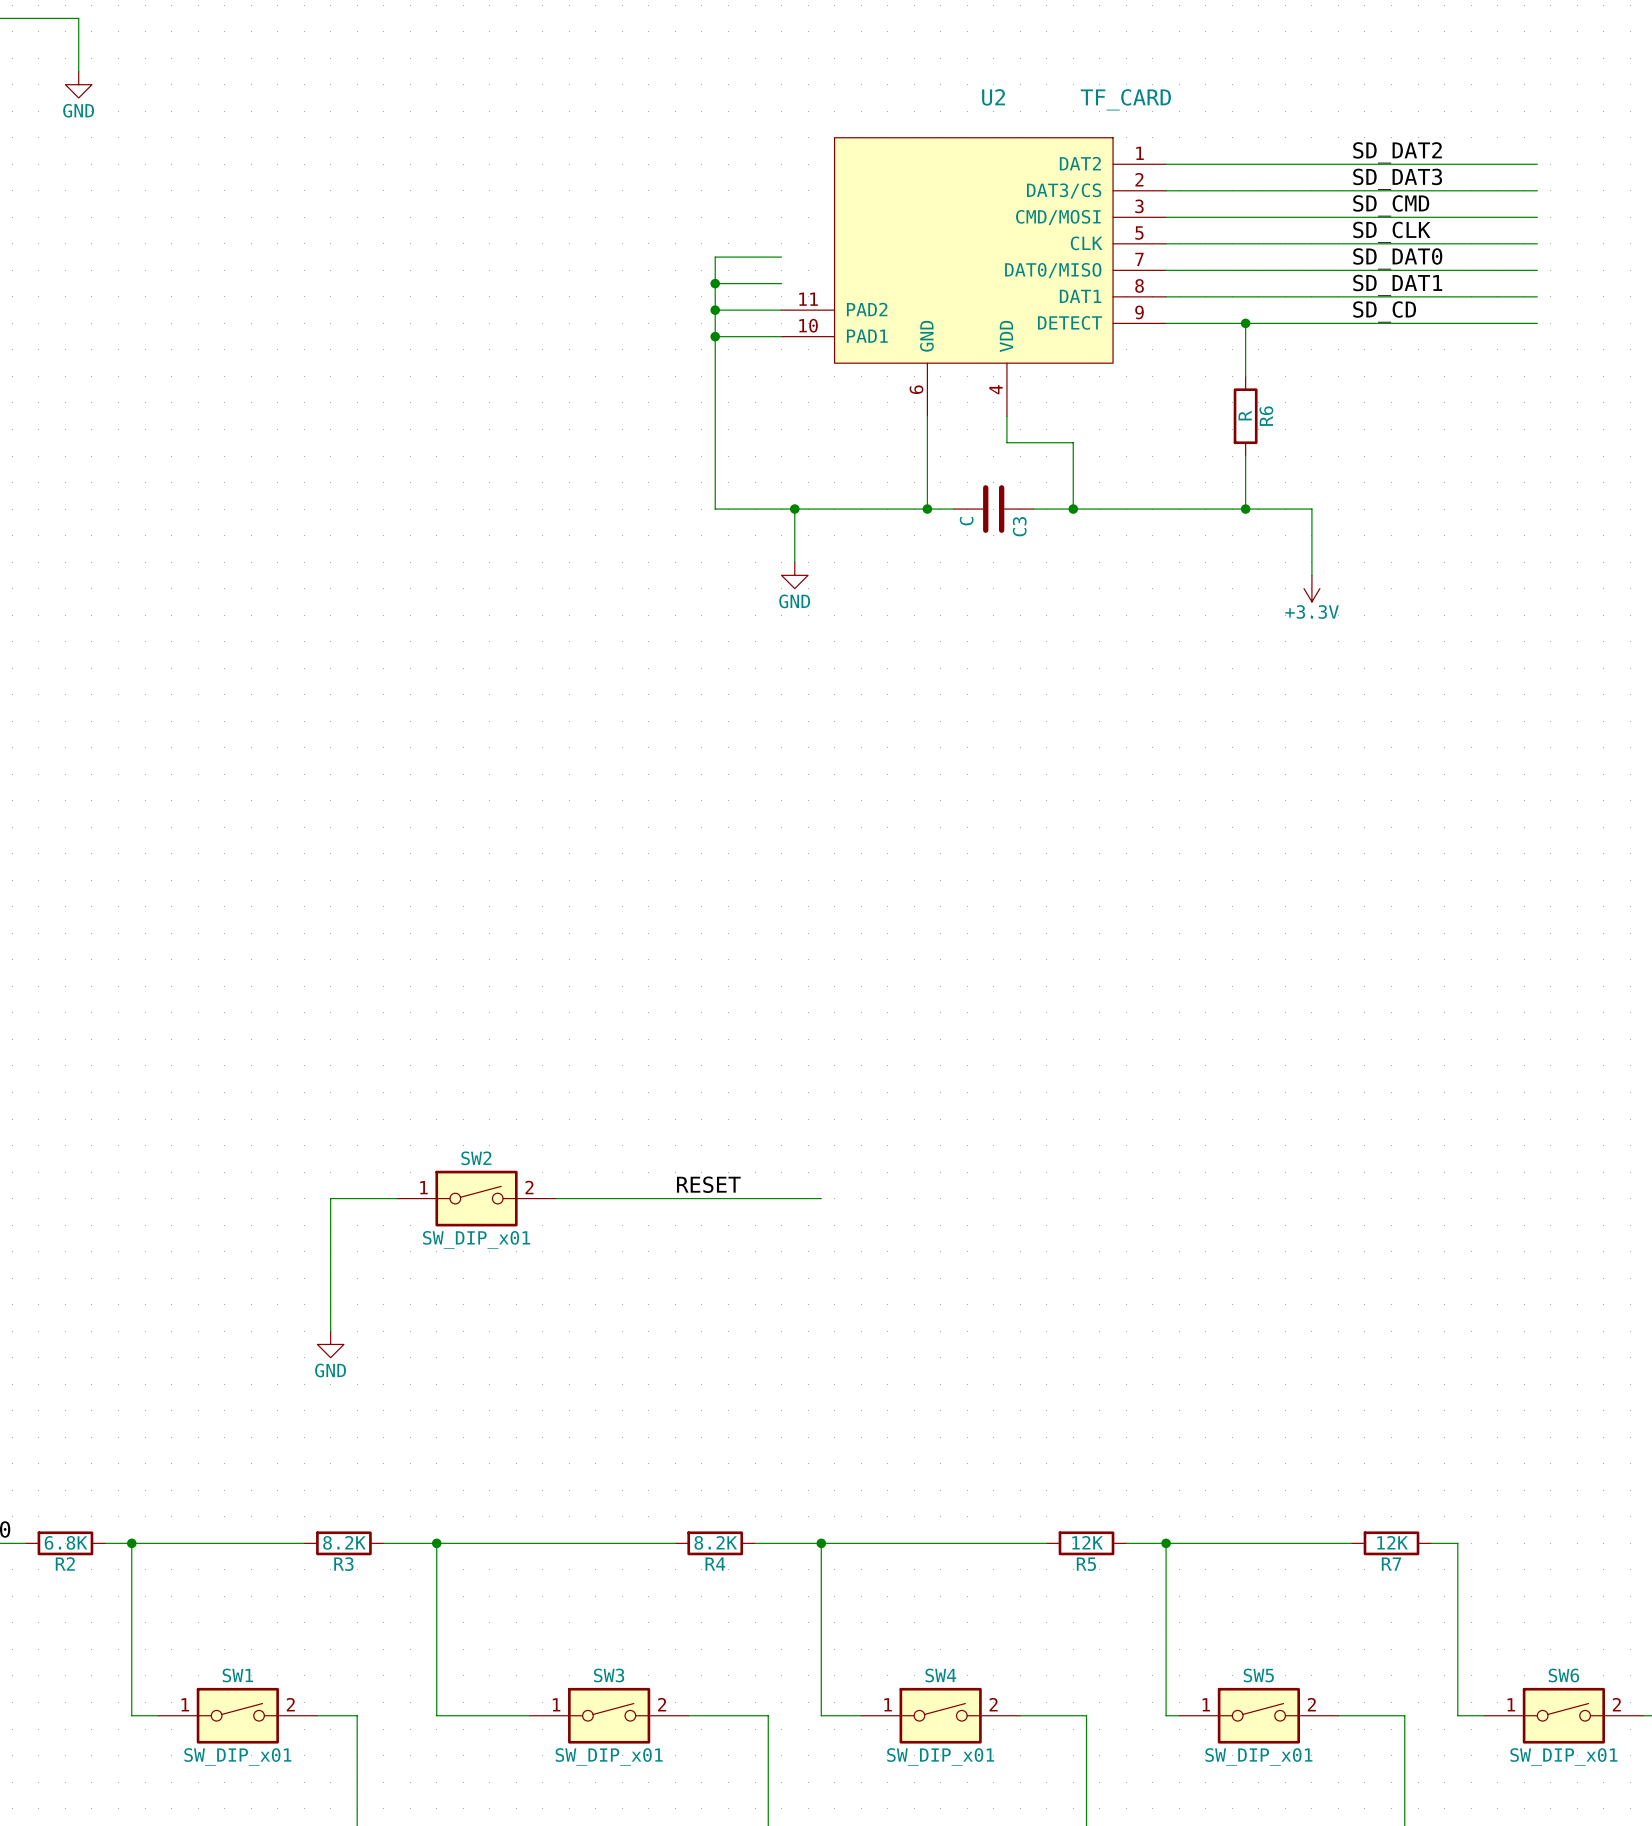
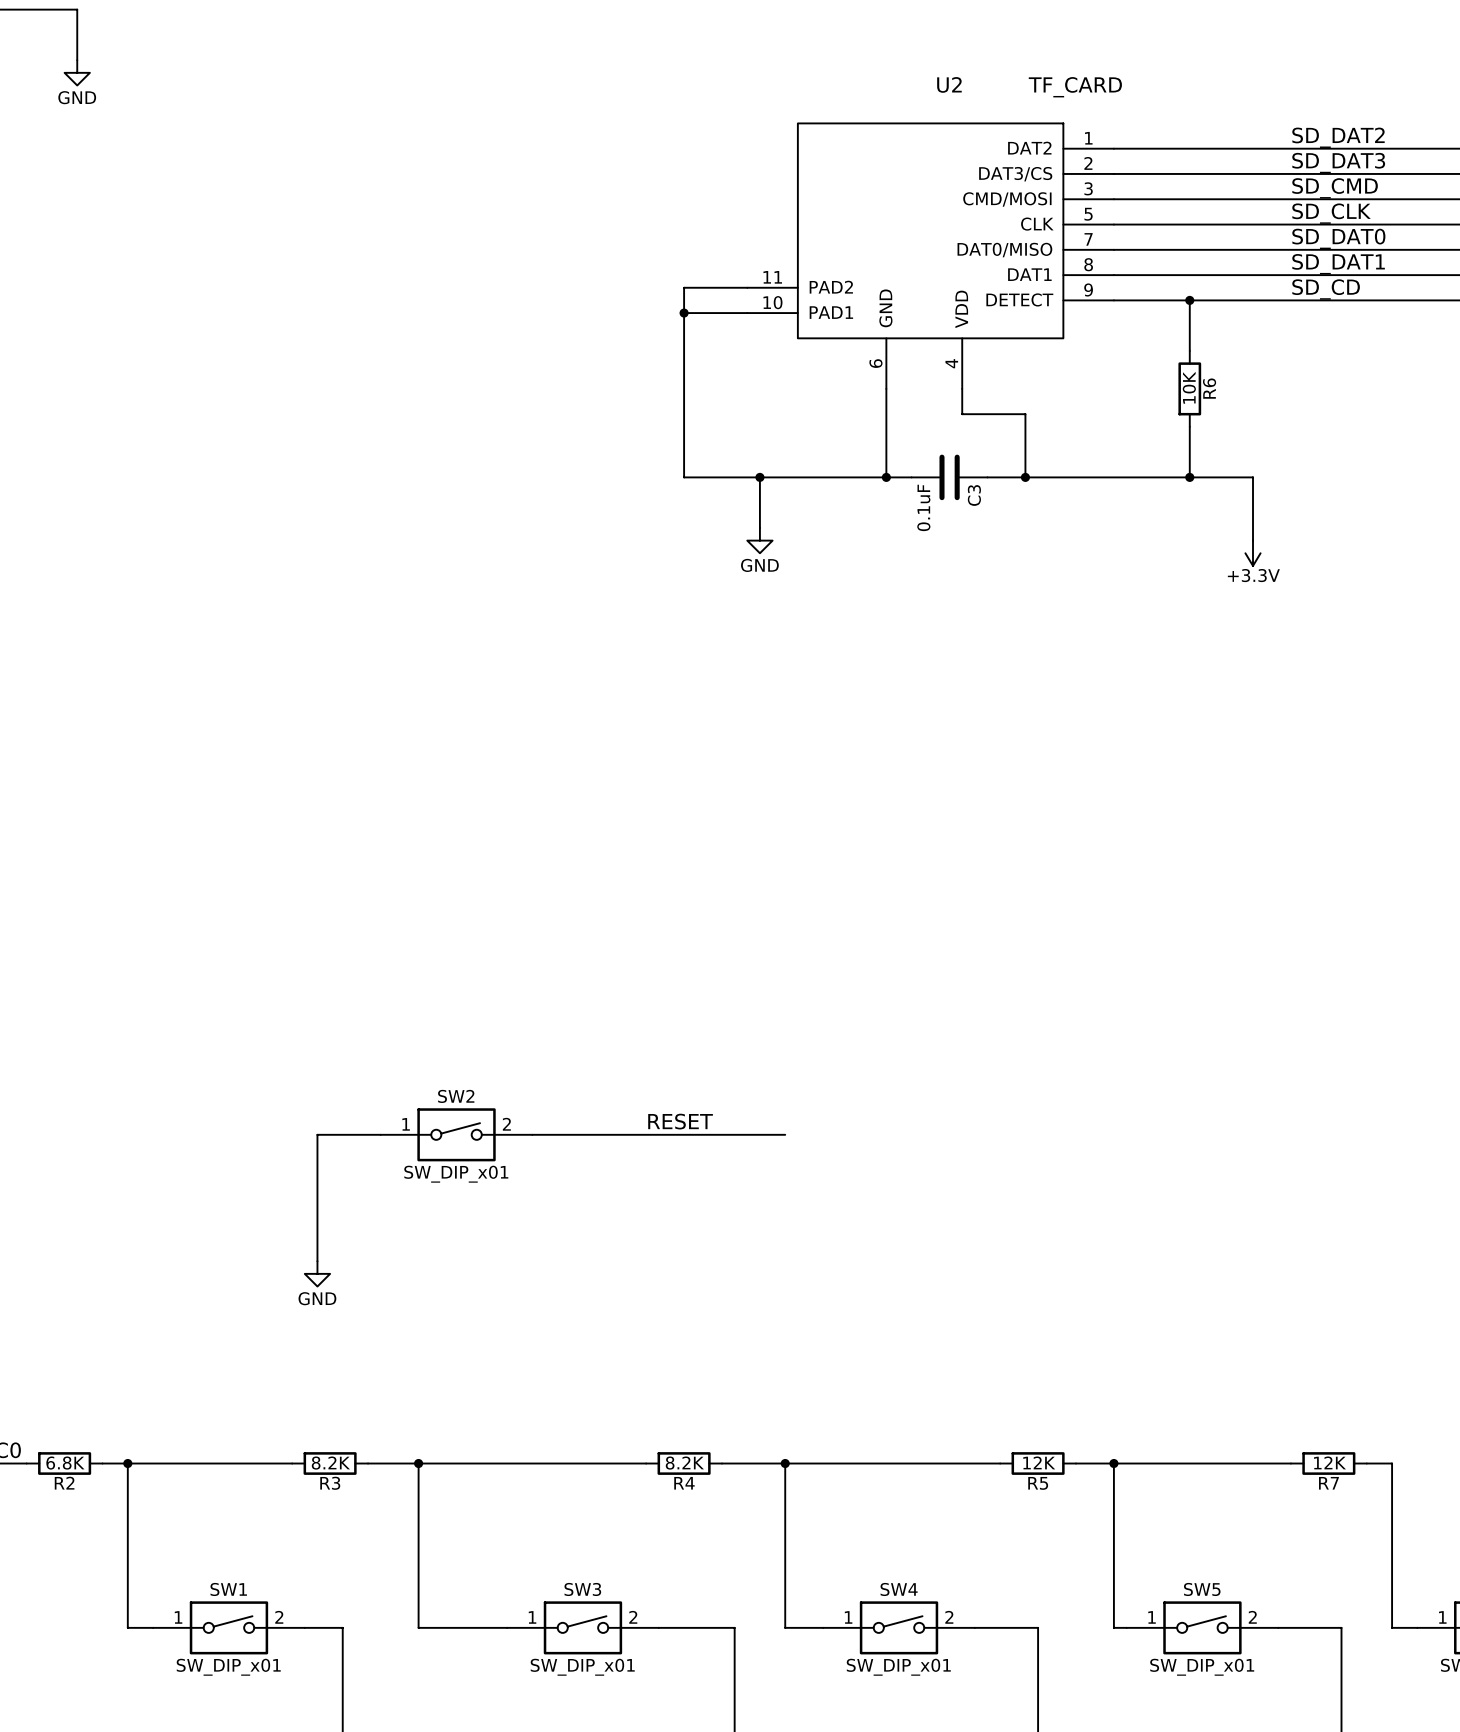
wire: (781, 257) (715, 257) (715, 310) -> none
wire: (715, 283) (781, 283) -> none
junction: (715, 283) -> none
junction: (715, 310) -> none
R6 value: R (1245, 415) -> 10K (1189, 387)
C3 value: C (966, 521) -> 0.1uF (923, 507)

